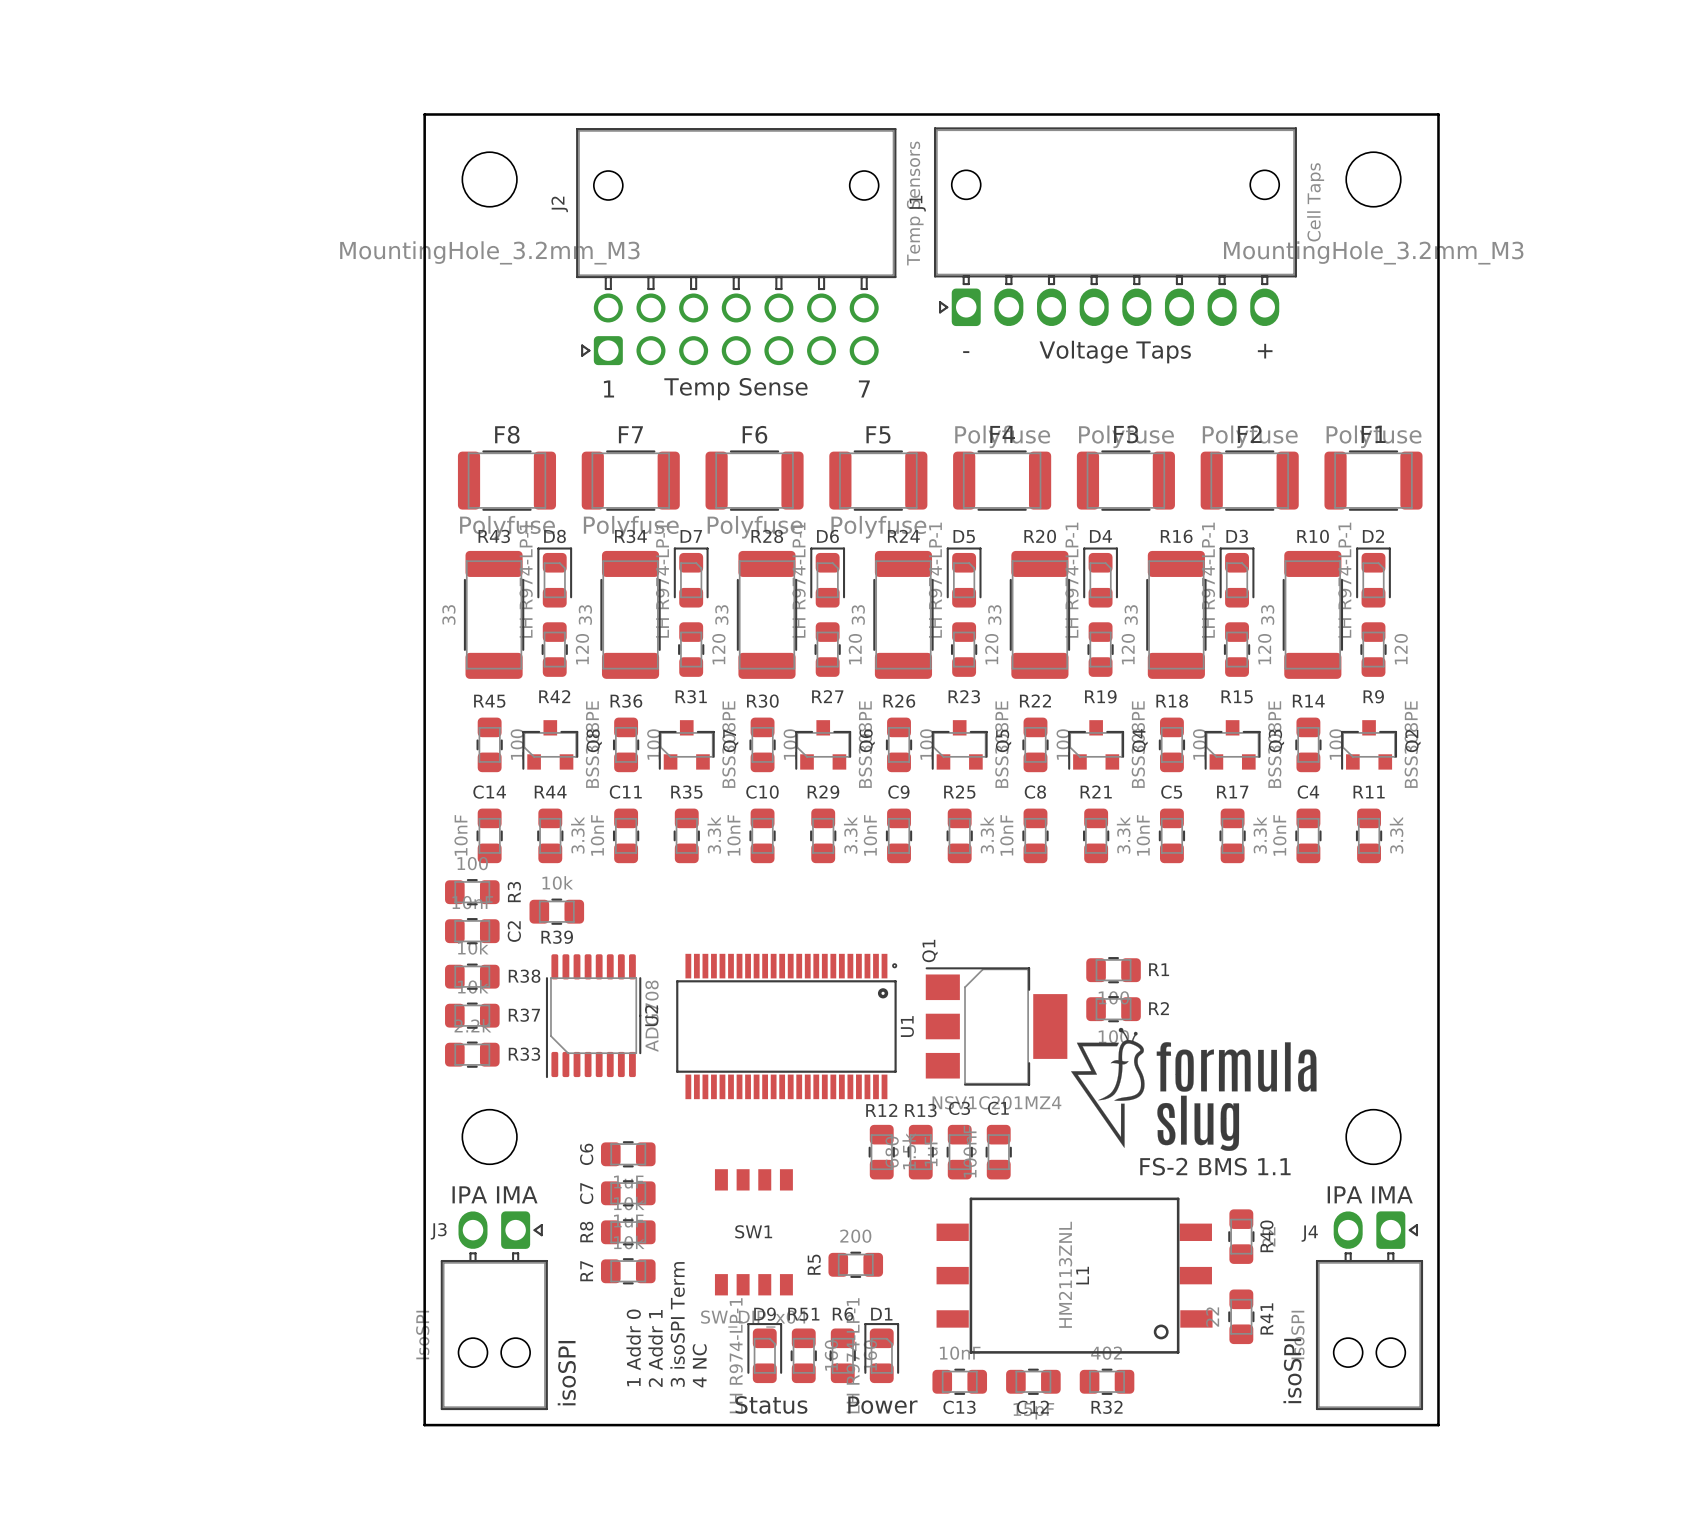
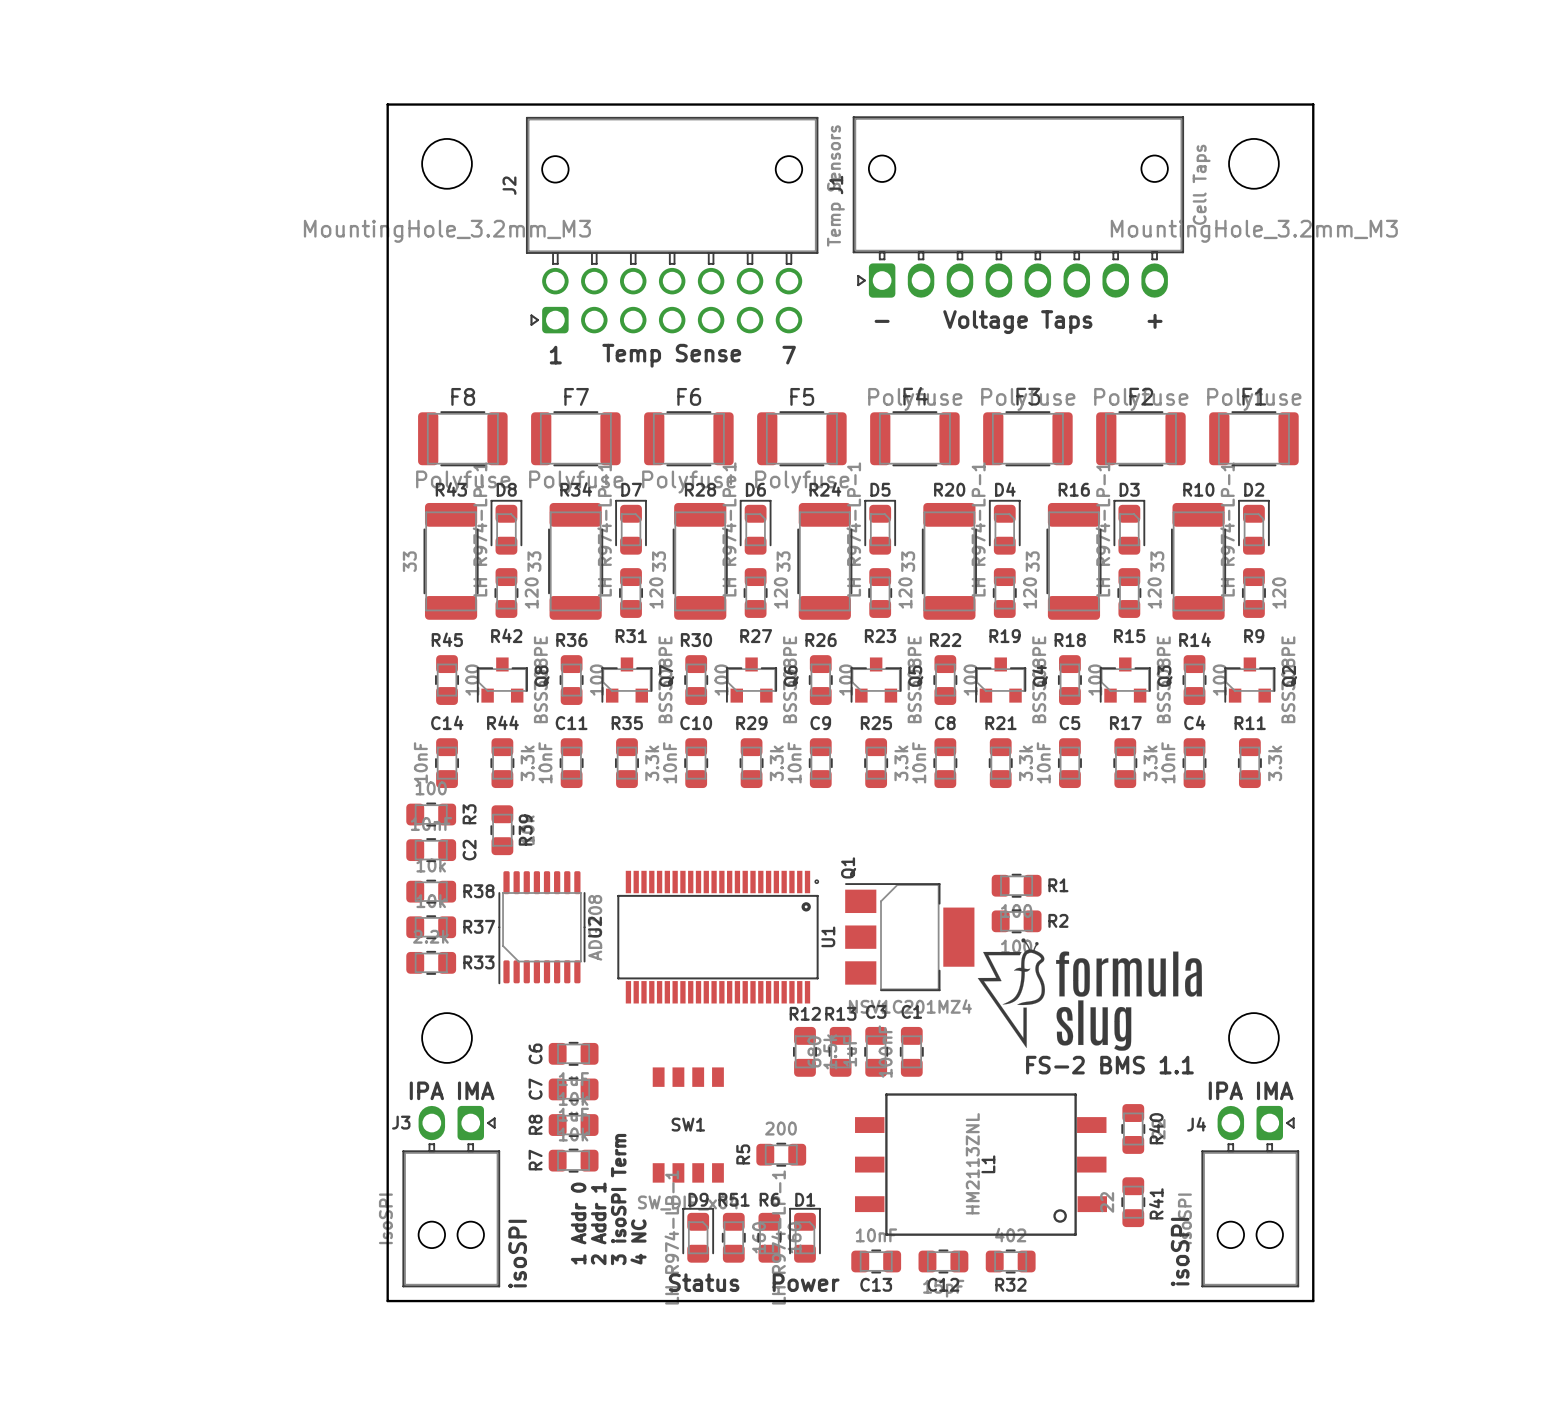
R39 rotation: 0° (556, 911) -> 90° clockwise (502, 830)
R39 name position: R39 (557, 937) -> R39 (525, 830)

